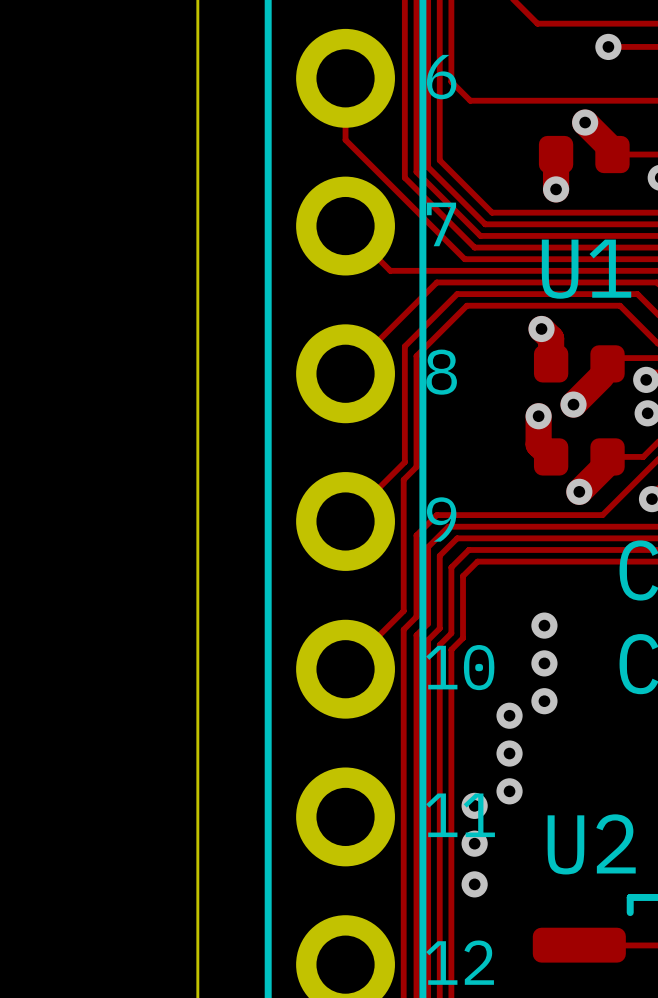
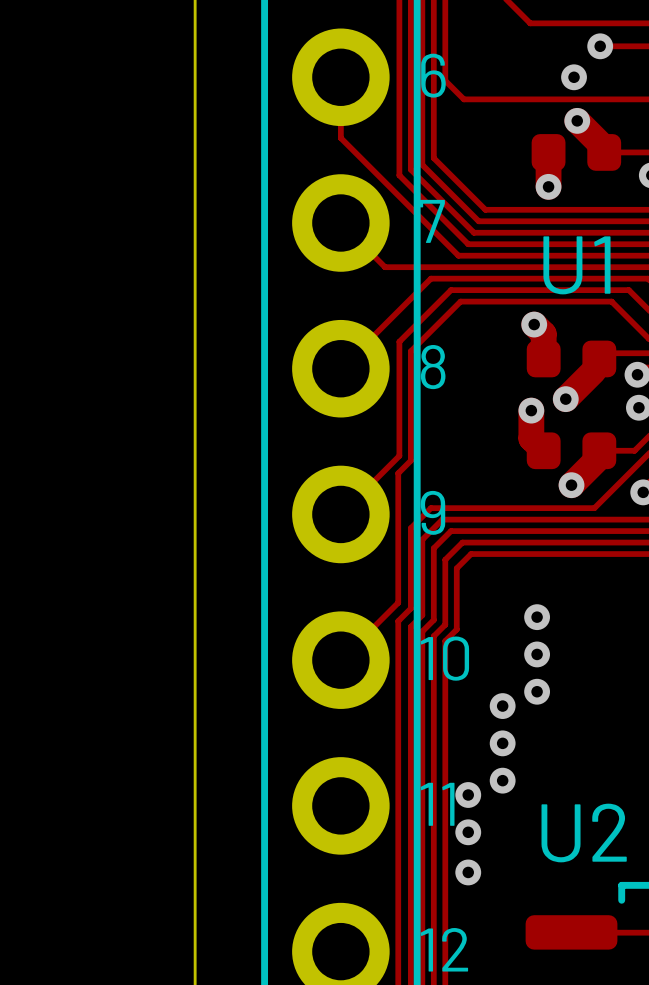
via: none -> (574, 77)

